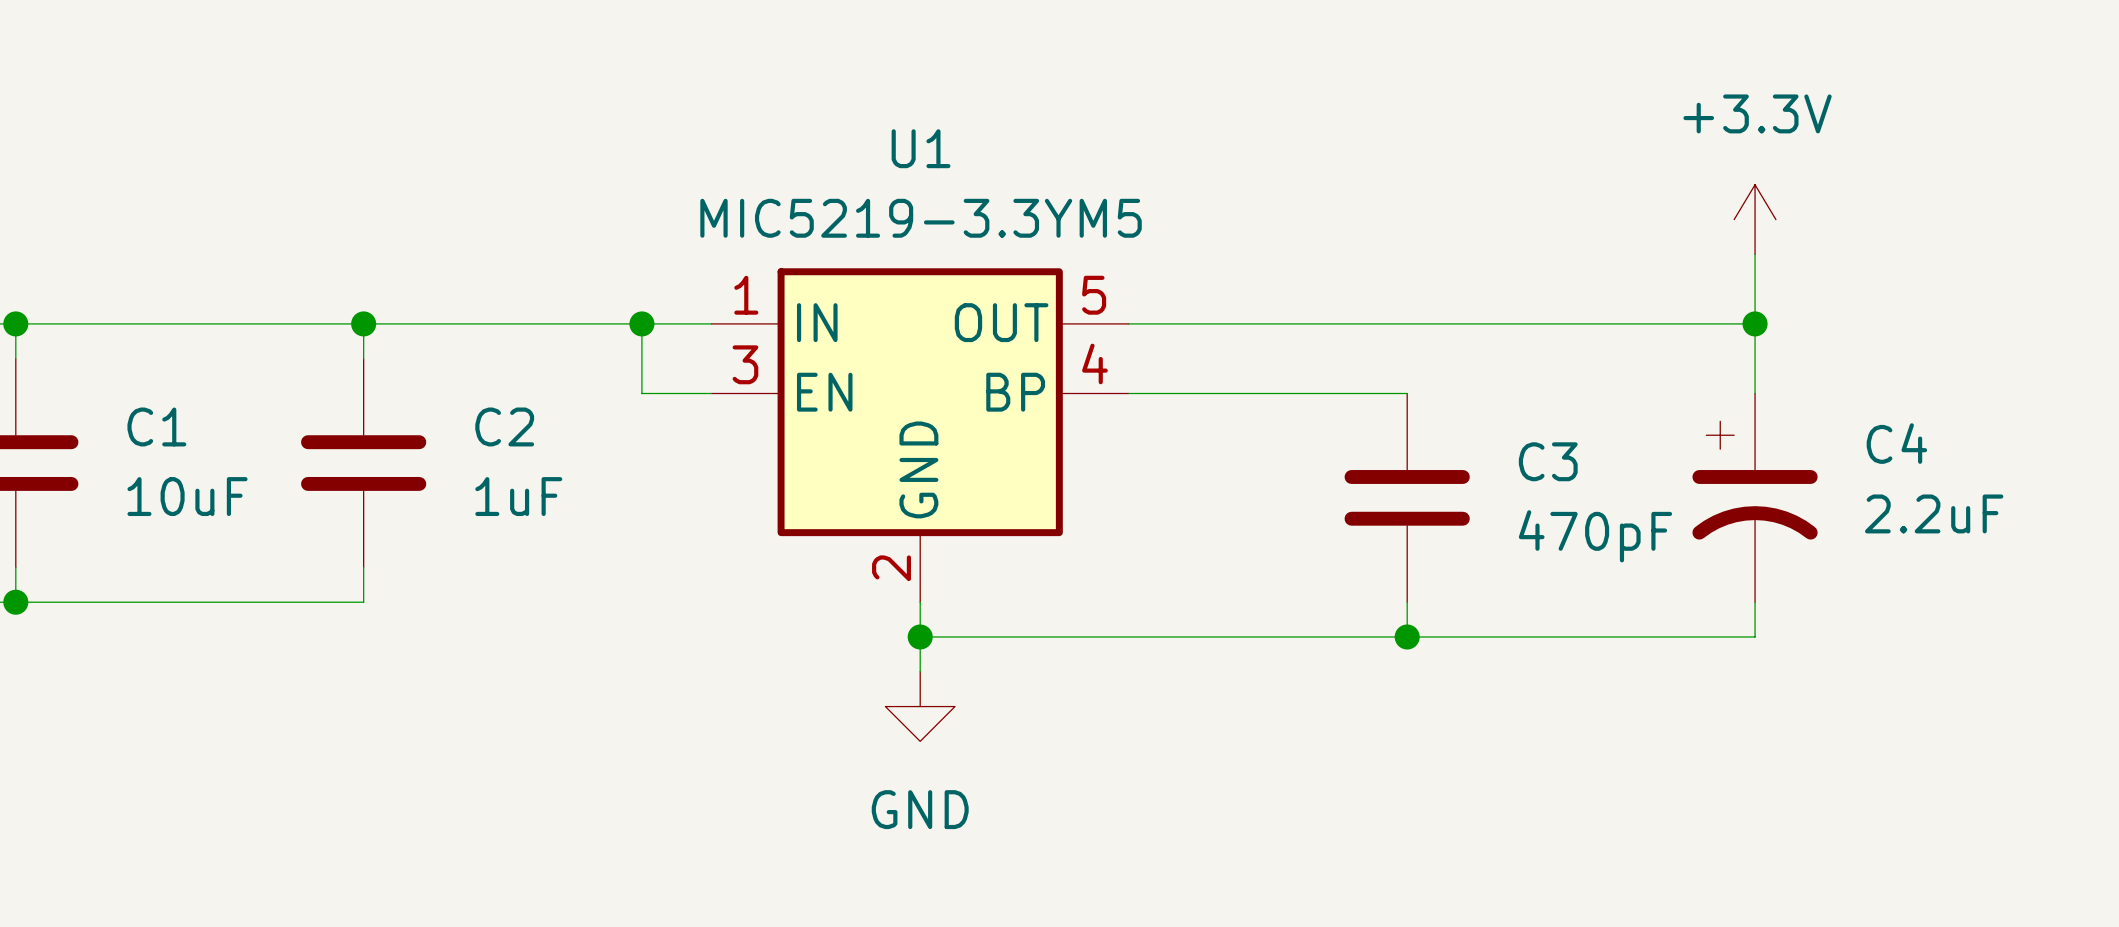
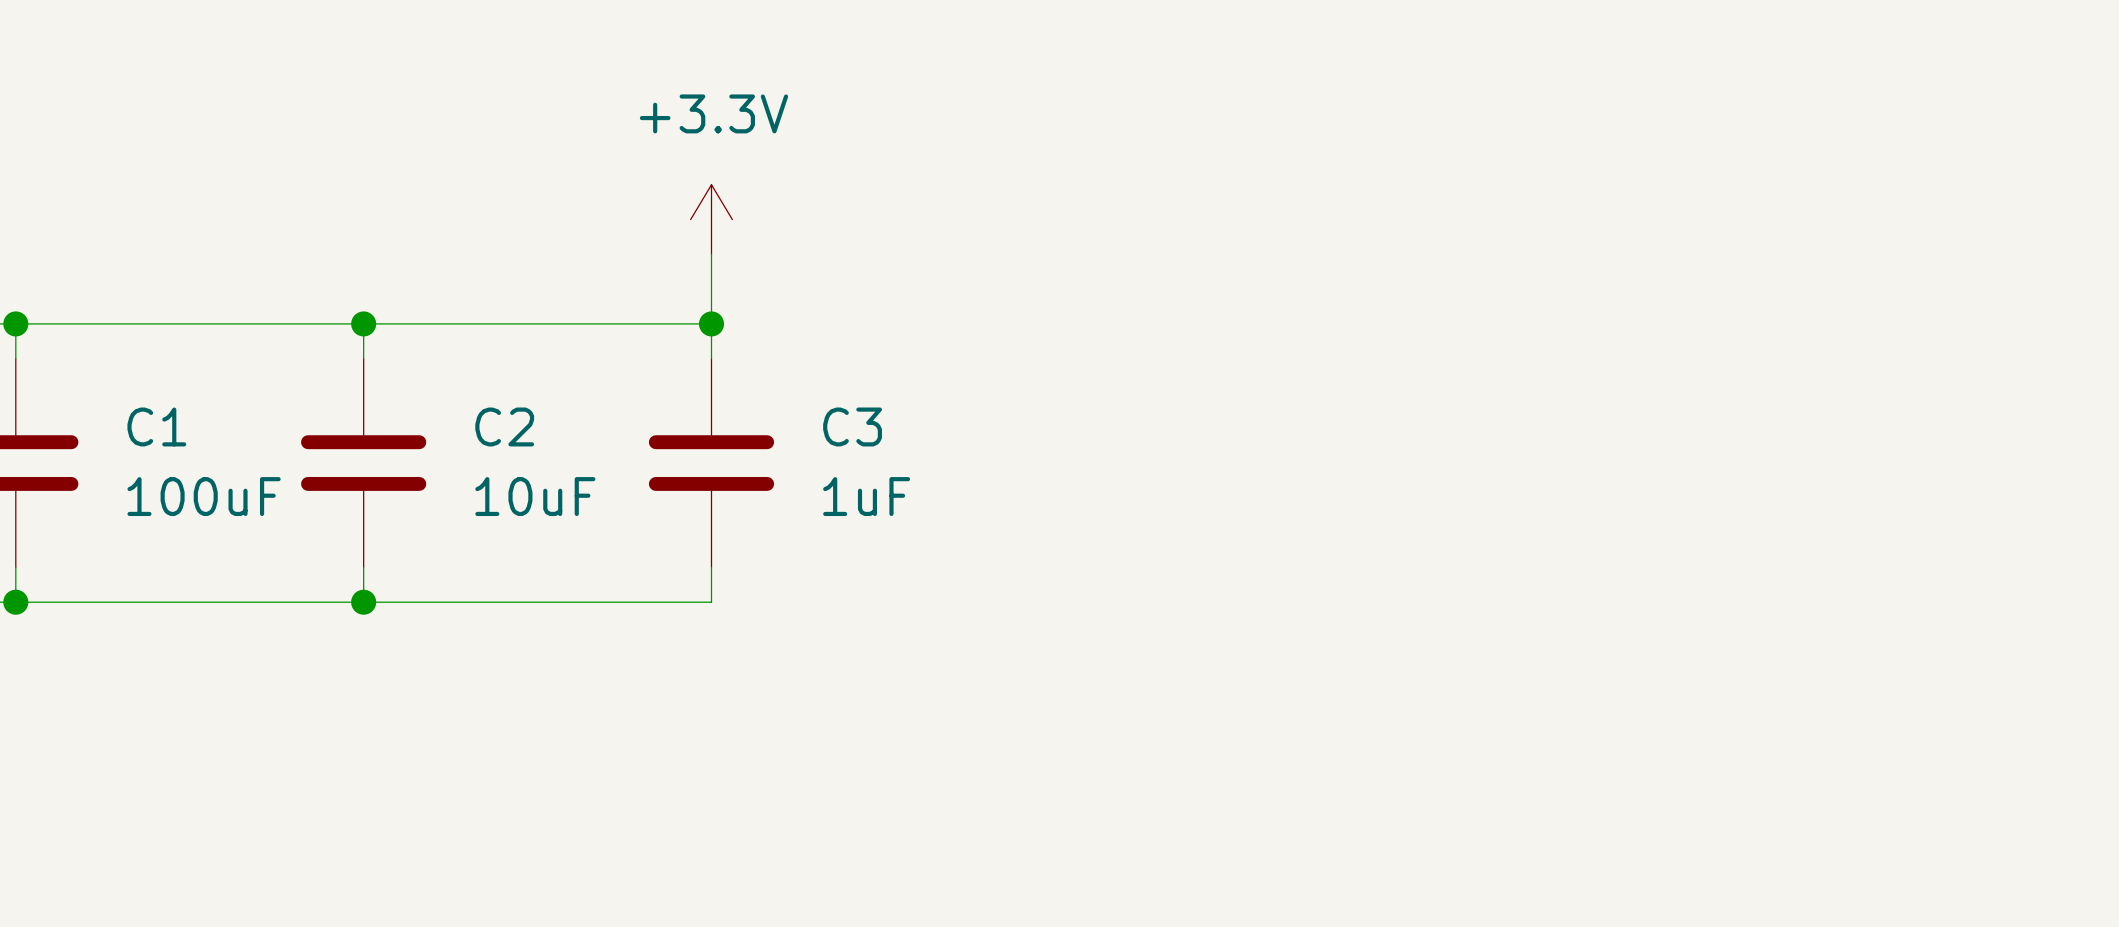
power symbol: none -> +3.3V (711, 219)
power symbol: +3.3V (1755, 219) -> none
wire: none -> (711, 254) (711, 358)
wire: (1755, 254) (1755, 393) -> none
wire: (641, 323) (641, 393) (711, 393) -> none
junction position: (641, 323) -> (711, 323)
wire: (1128, 323) (1755, 323) -> none
junction: (1755, 323) -> none
wire: (1128, 393) (1407, 393) -> none
U1: MIC5219-3.3YM5 (920, 435) -> none
C1 value: 10uF (187, 496) -> 100uF (204, 496)
C2 value: 1uF (518, 496) -> 10uF (535, 496)
C3 position: (1407, 497) -> (711, 463)
C4: 2.2uF (1755, 497) -> none
C3 value: 470pF (1595, 536) -> 1uF (866, 496)
wire: none -> (711, 567) (711, 602) (363, 602)
junction: none -> (363, 602)
wire: (920, 602) (920, 671) -> none
wire: (1407, 602) (1407, 636) -> none
wire: (1755, 602) (1755, 636) (920, 636) -> none
junction: (920, 636) -> none
junction: (1407, 636) -> none
power symbol: GND (920, 706) -> none

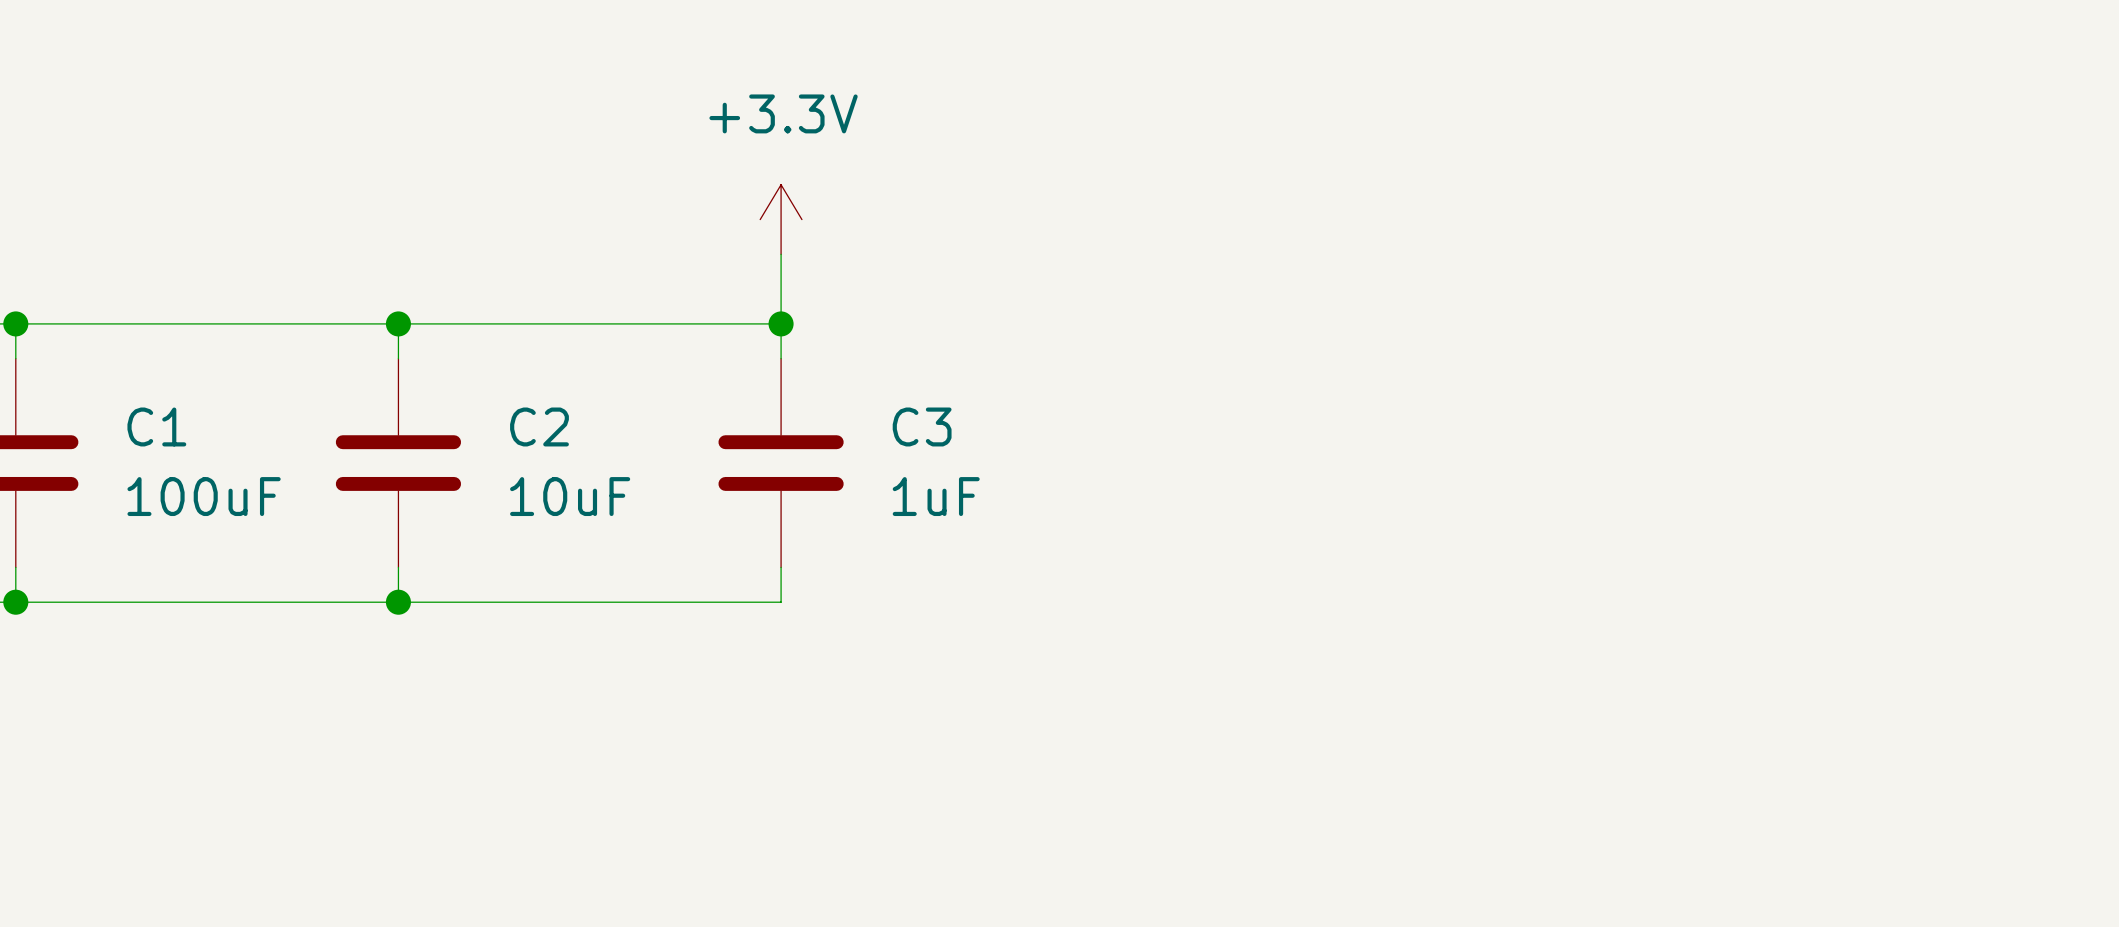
power symbol position: +3.3V (711, 219) -> +3.3V (781, 219)
wire: (711, 254) (711, 358) -> (781, 254) (781, 358)
wire: (363, 323) (363, 358) -> (398, 323) (398, 358)
junction position: (363, 323) -> (398, 323)
wire: none -> (711, 323) (781, 323)
junction position: (711, 323) -> (781, 323)
C2 position: (363, 463) -> (398, 463)
C3 position: (711, 463) -> (781, 463)
wire: (363, 567) (363, 602) -> (398, 567) (398, 602)
wire: (711, 567) (711, 602) -> (781, 567) (781, 602) (711, 602)
junction position: (363, 602) -> (398, 602)

